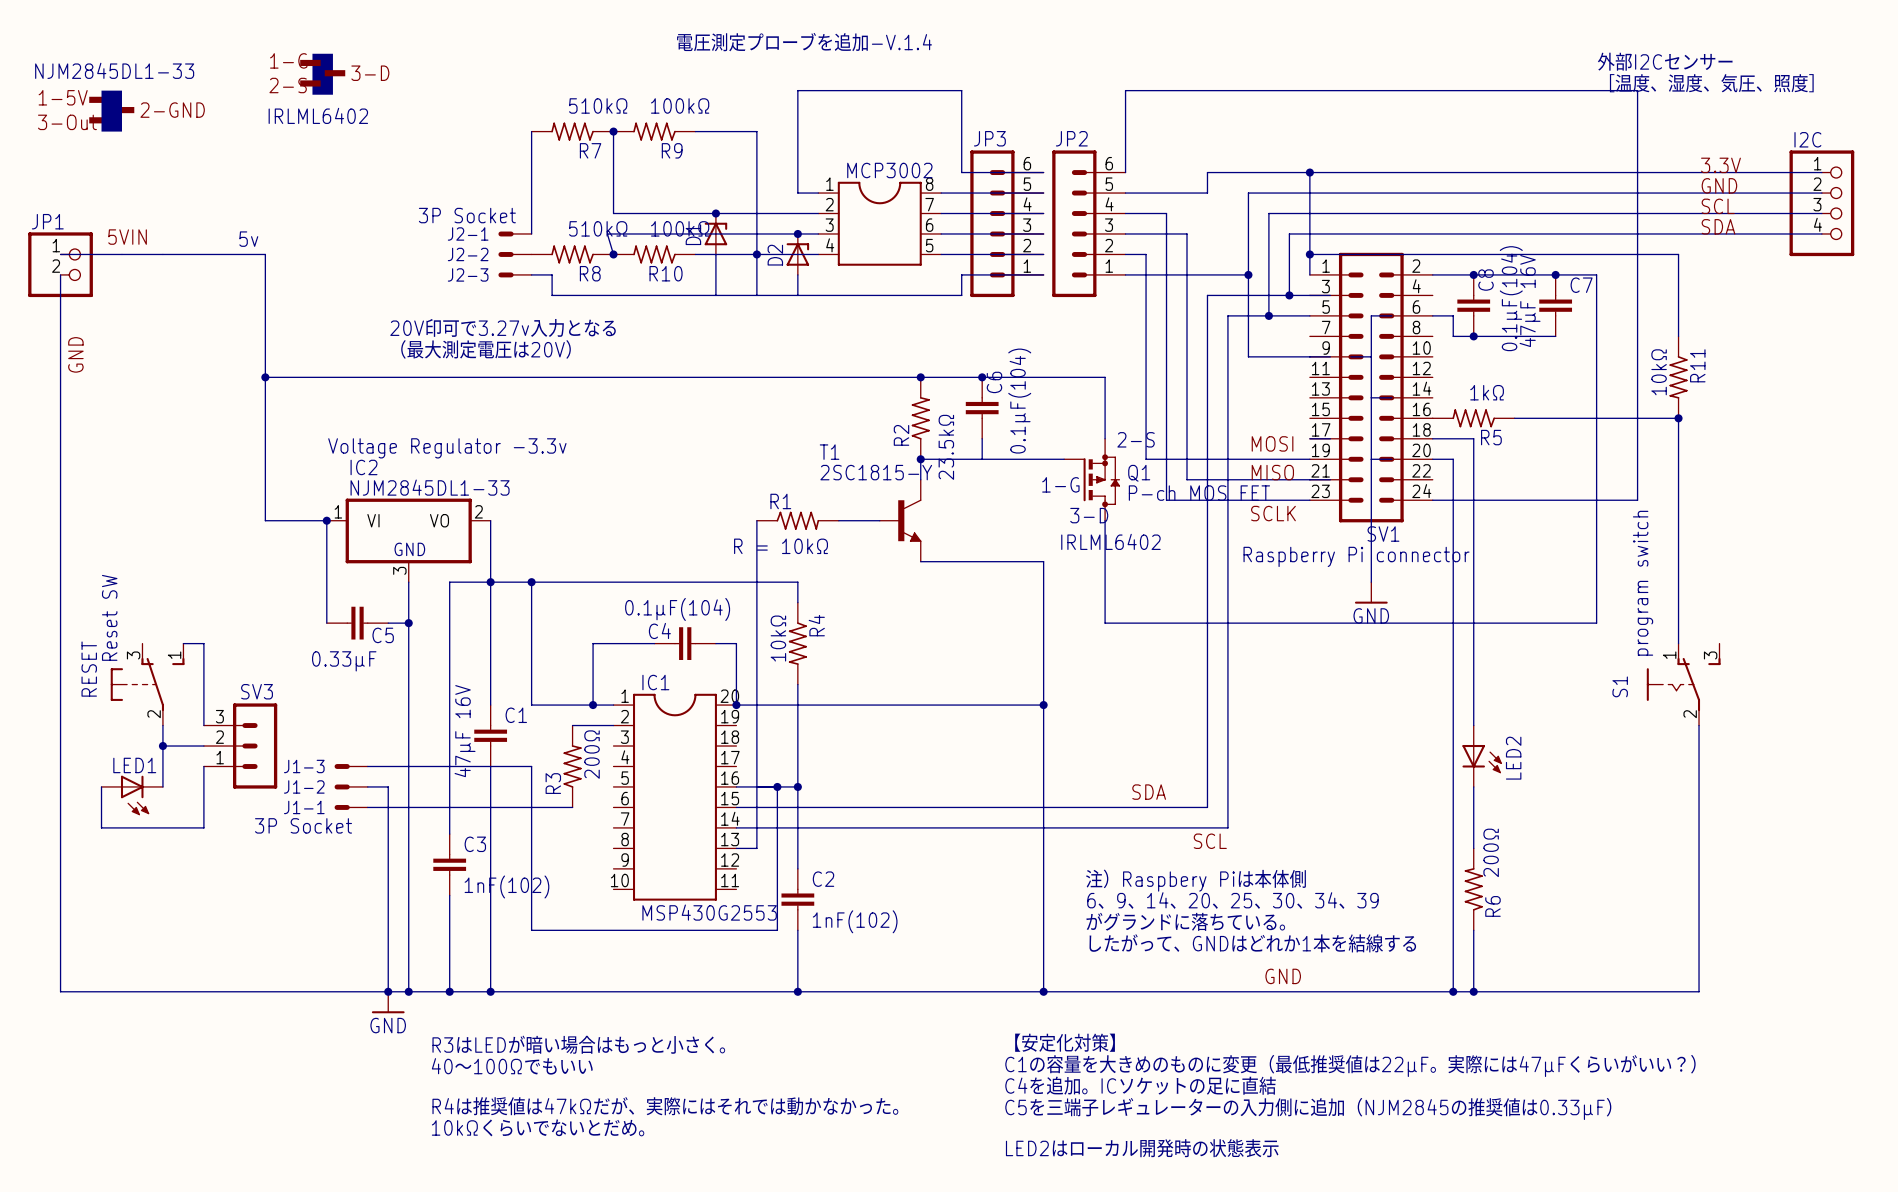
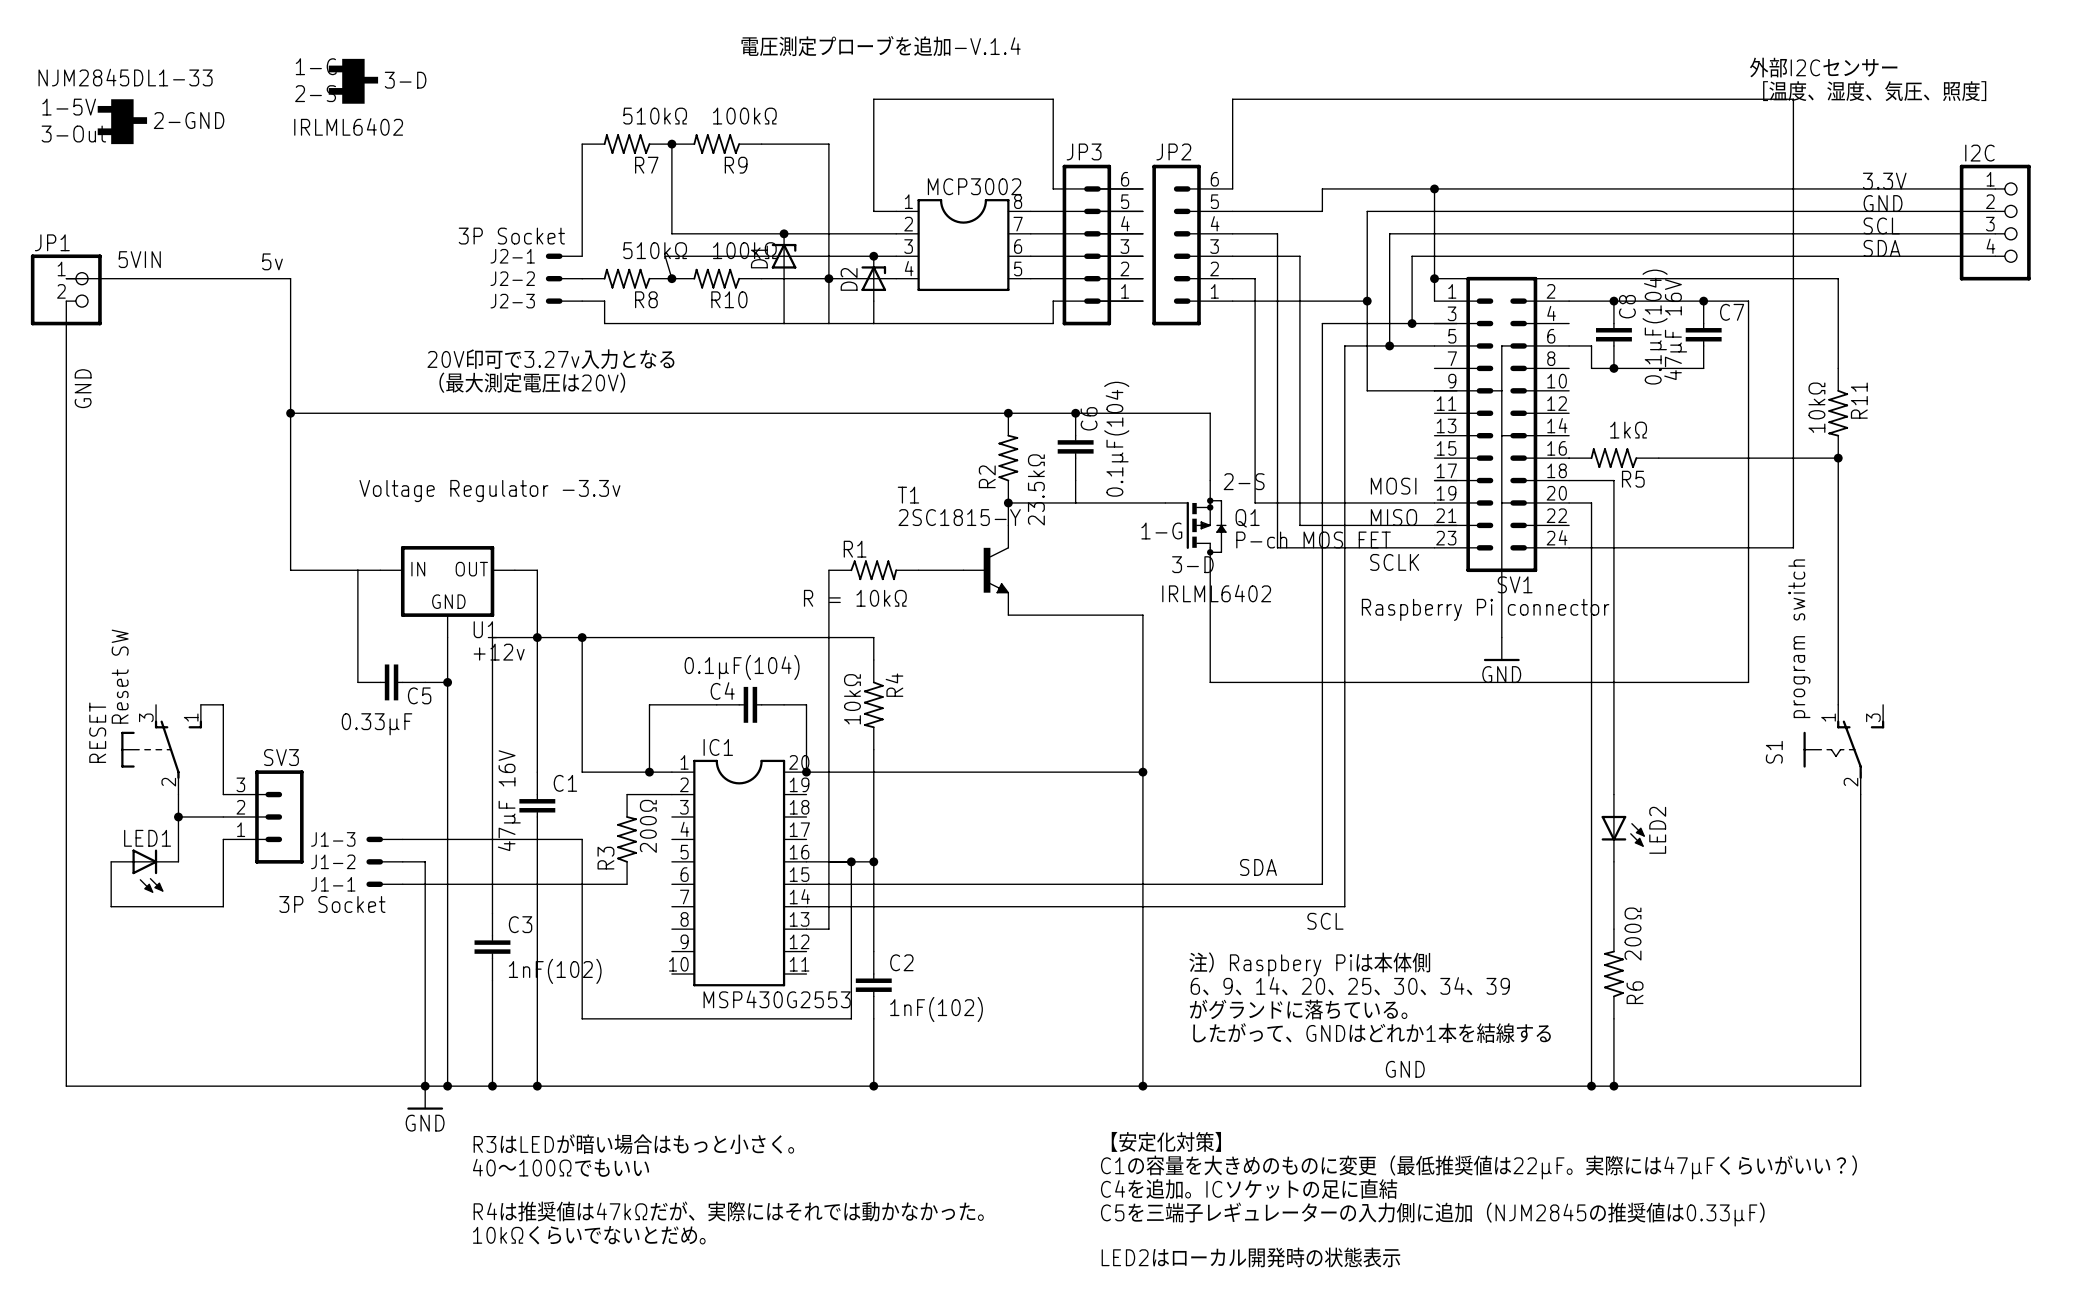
junction: (326, 520) -> none
IC2: NJM2845DL1-33 (408, 540) -> none
U1: none -> +12v (447, 591)

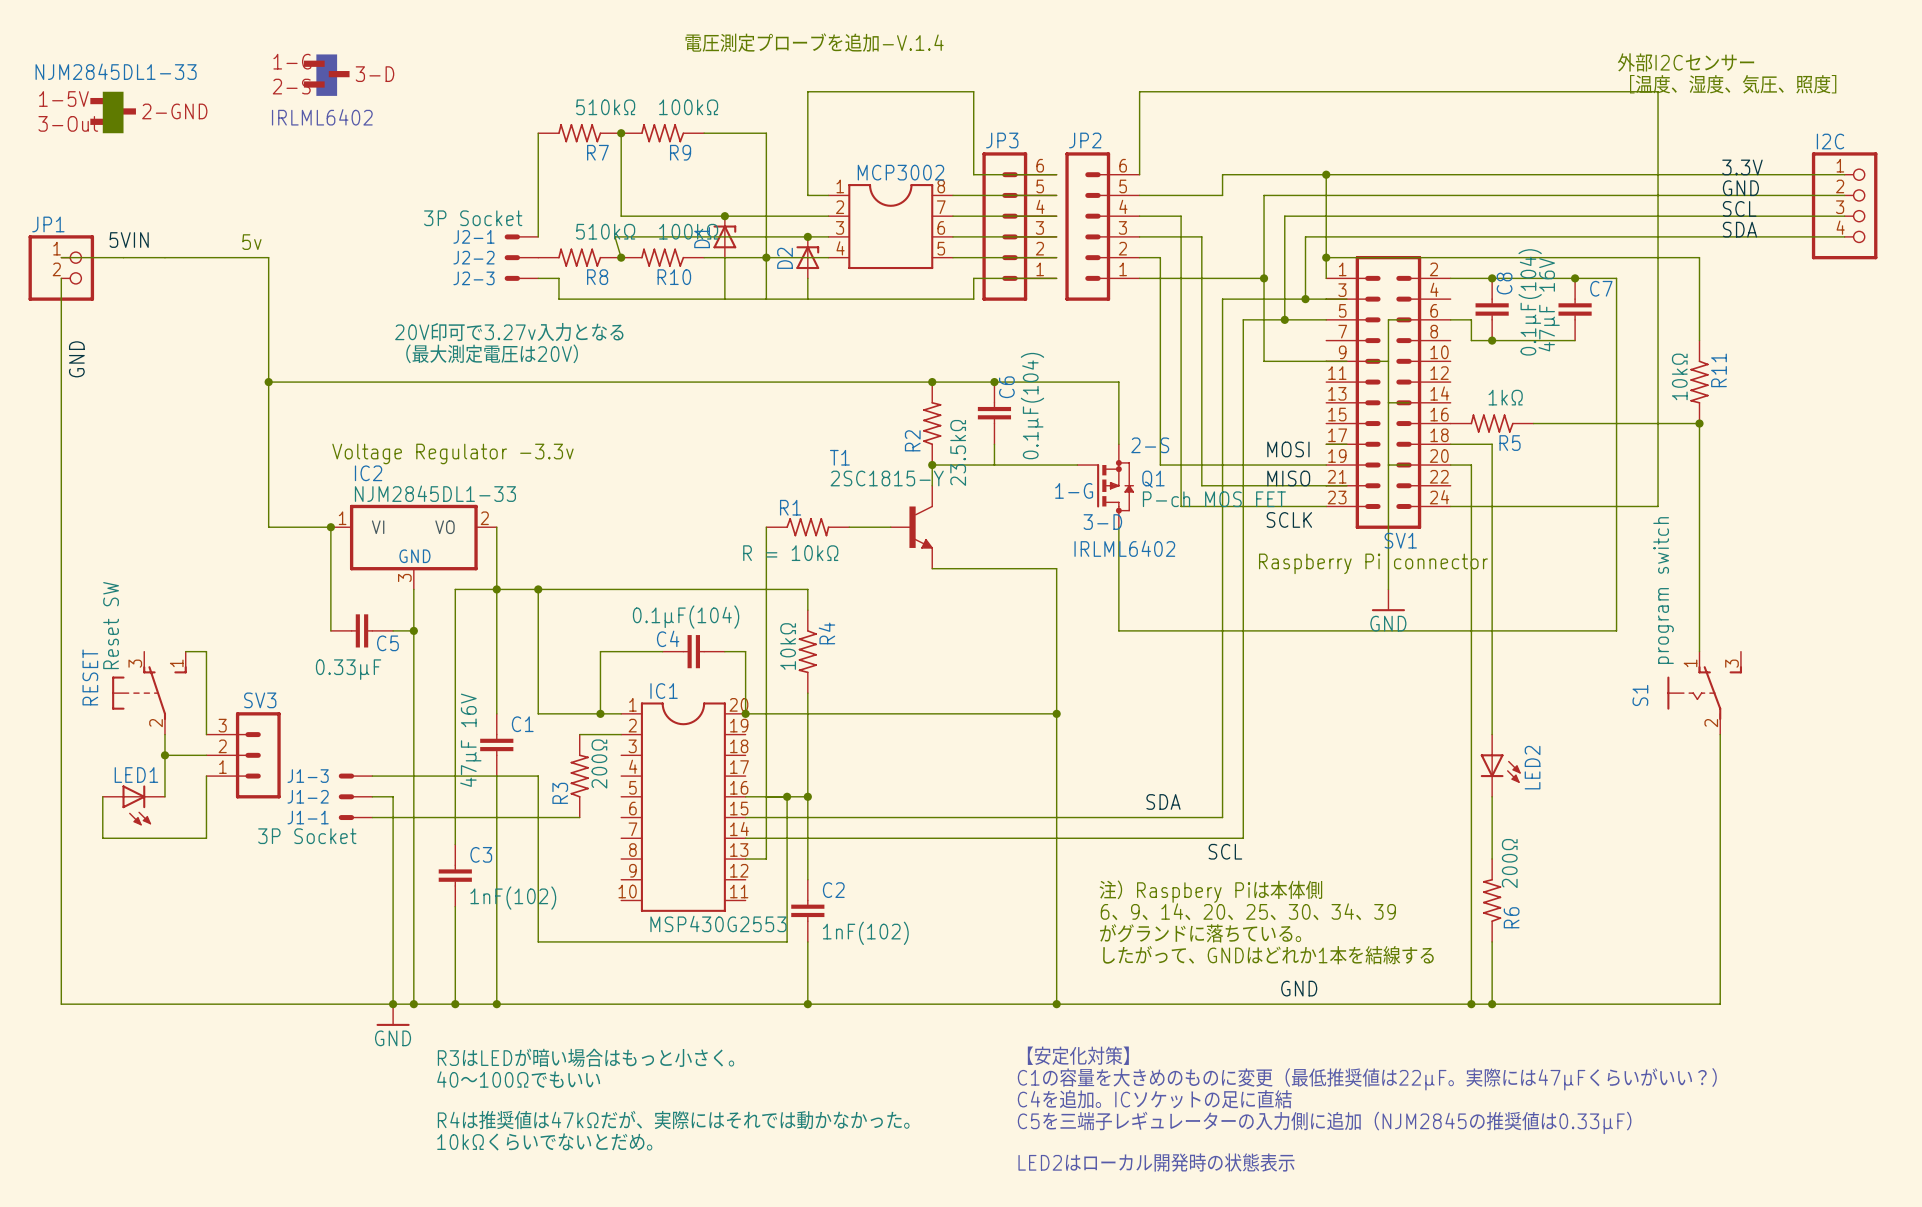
junction: none -> (330, 527)
U1: +12v (447, 591) -> none
IC2: none -> NJM2845DL1-33 (413, 547)

